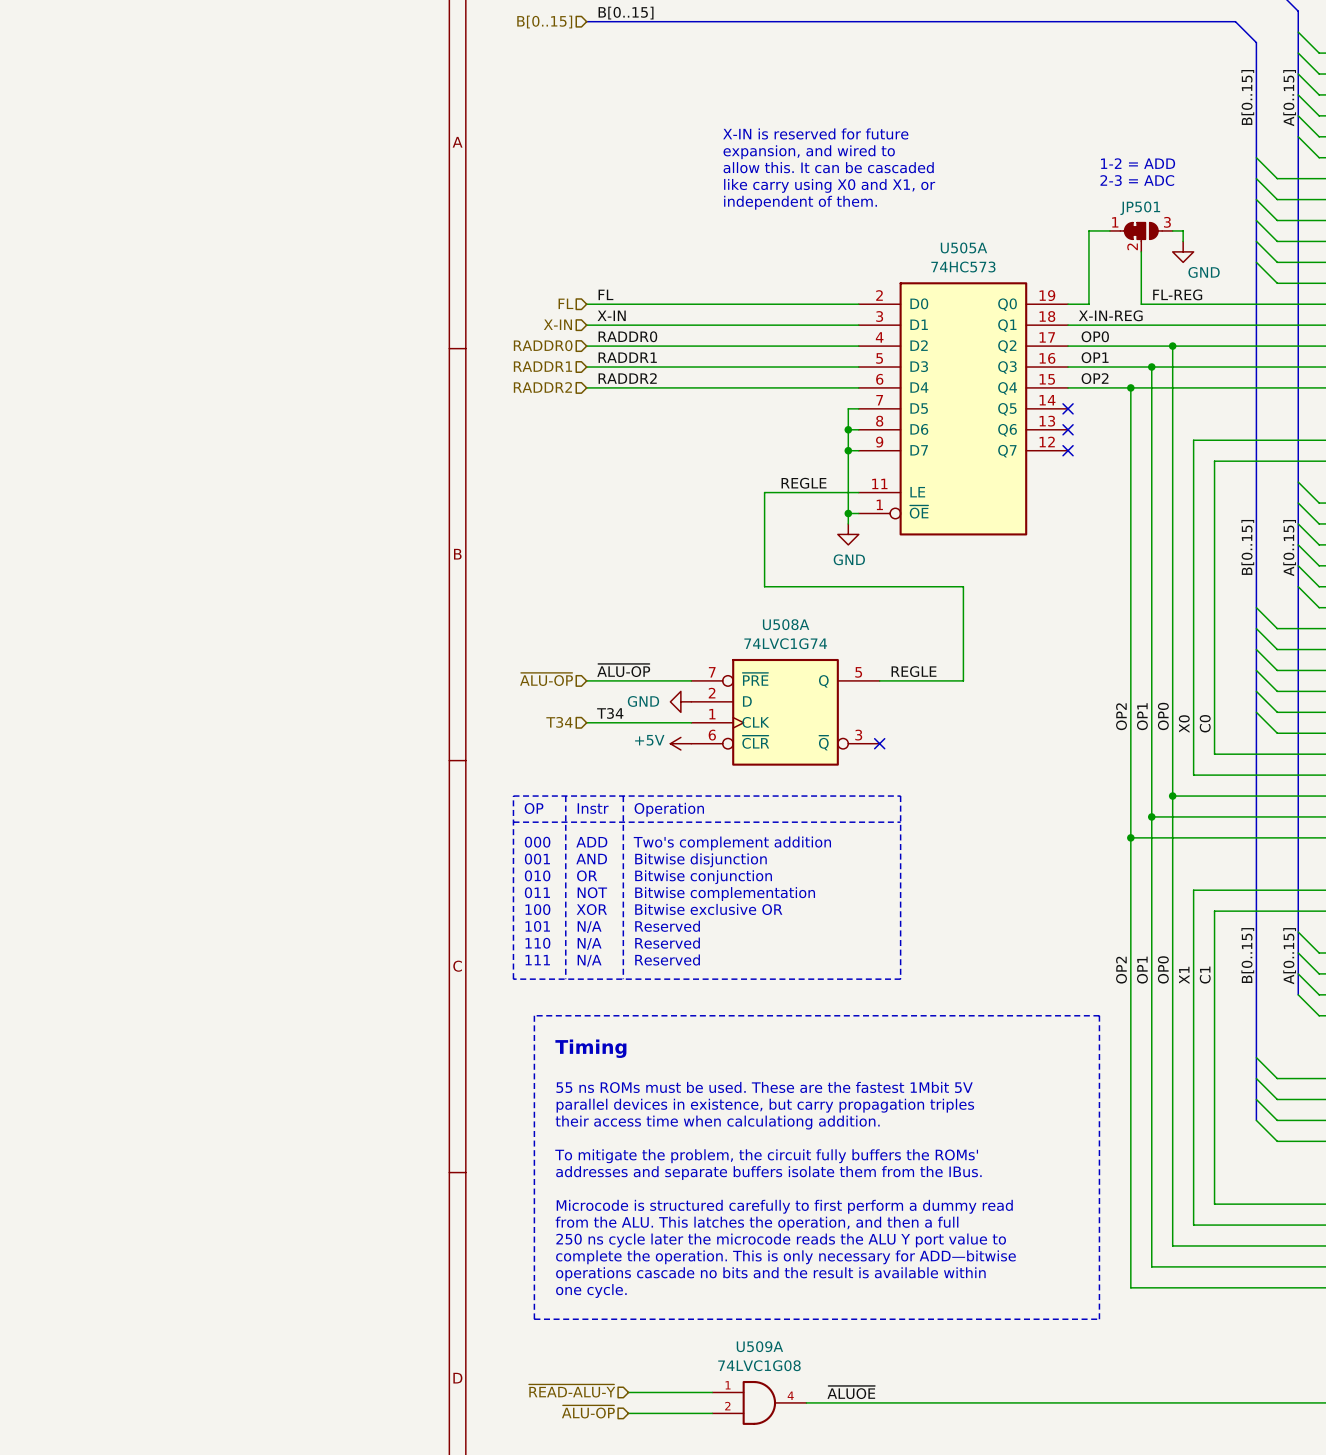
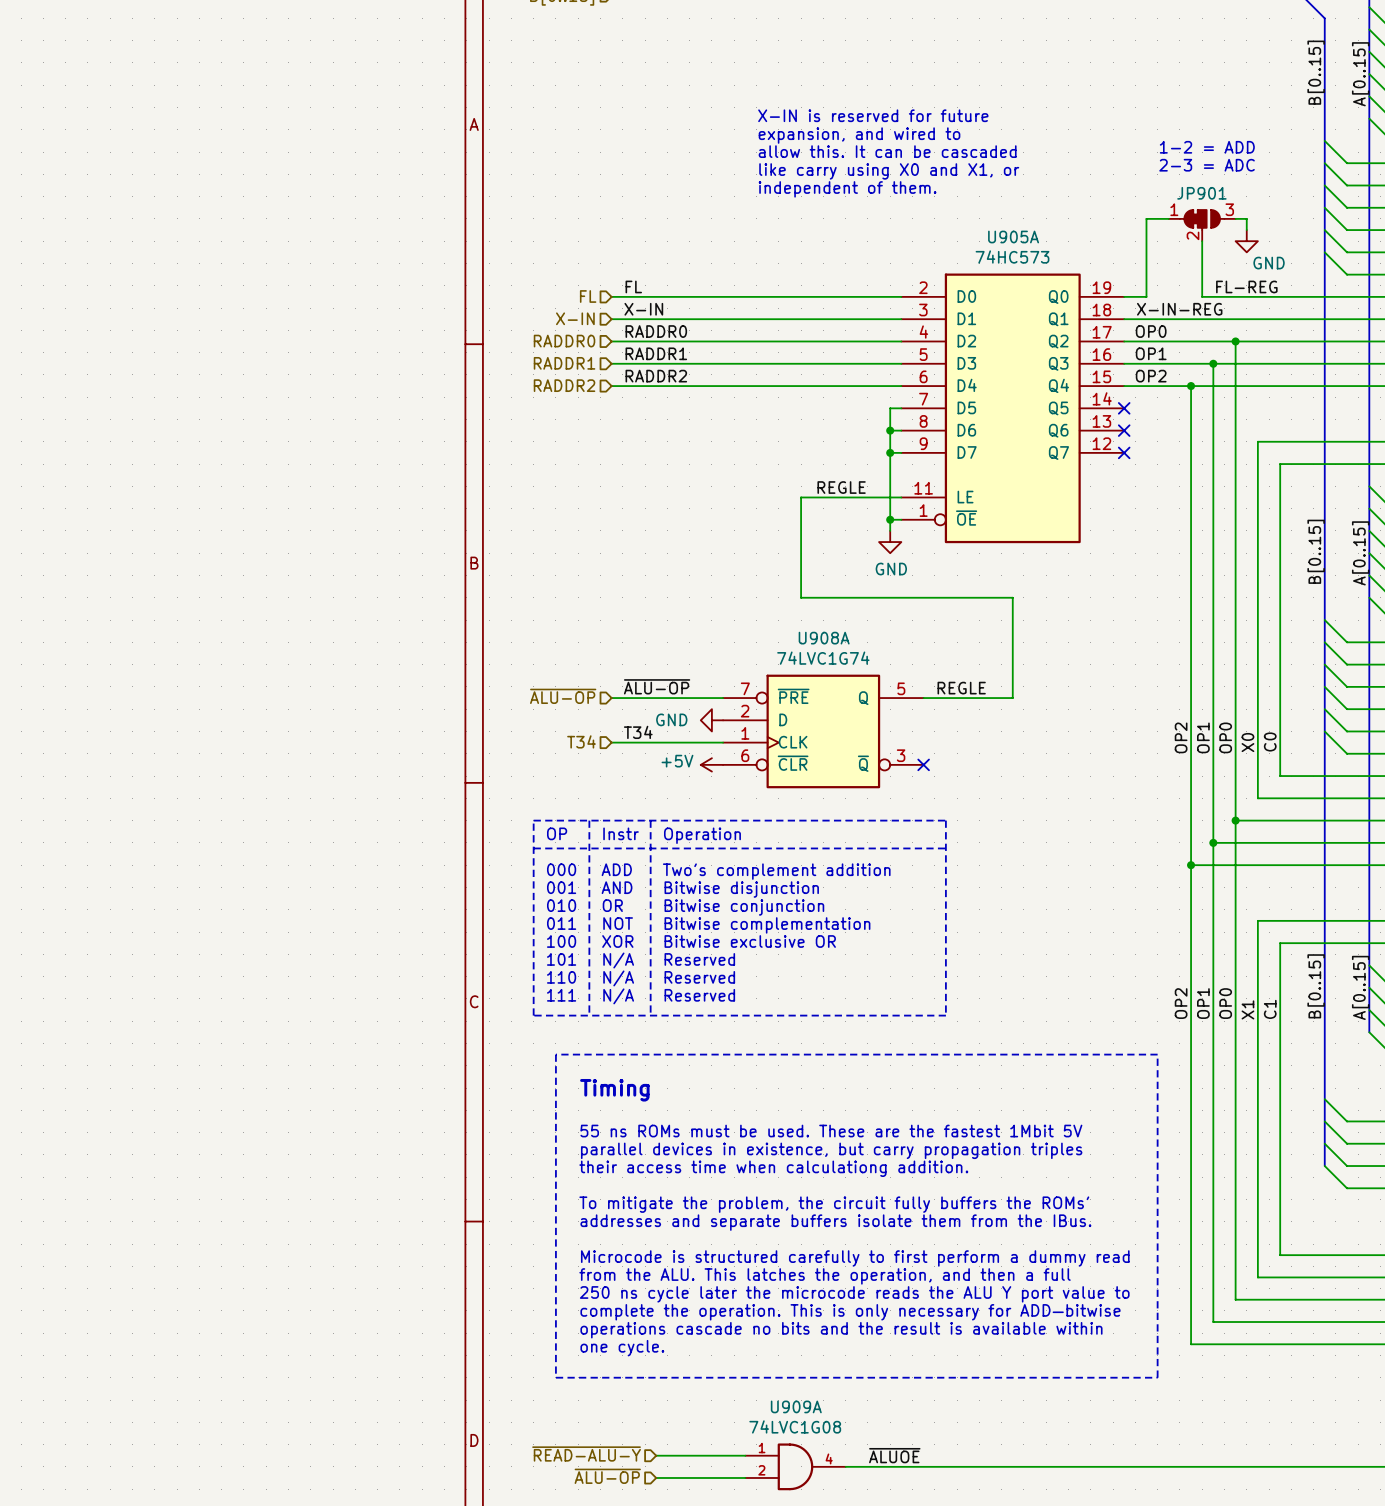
JP501 name: JP501 (1140, 208) -> JP901 (1201, 193)
U505A name: U505A (963, 247) -> U905A (1013, 237)
U508A name: U508A (786, 624) -> U908A (824, 638)
U509A name: U509A (759, 1346) -> U909A (796, 1406)

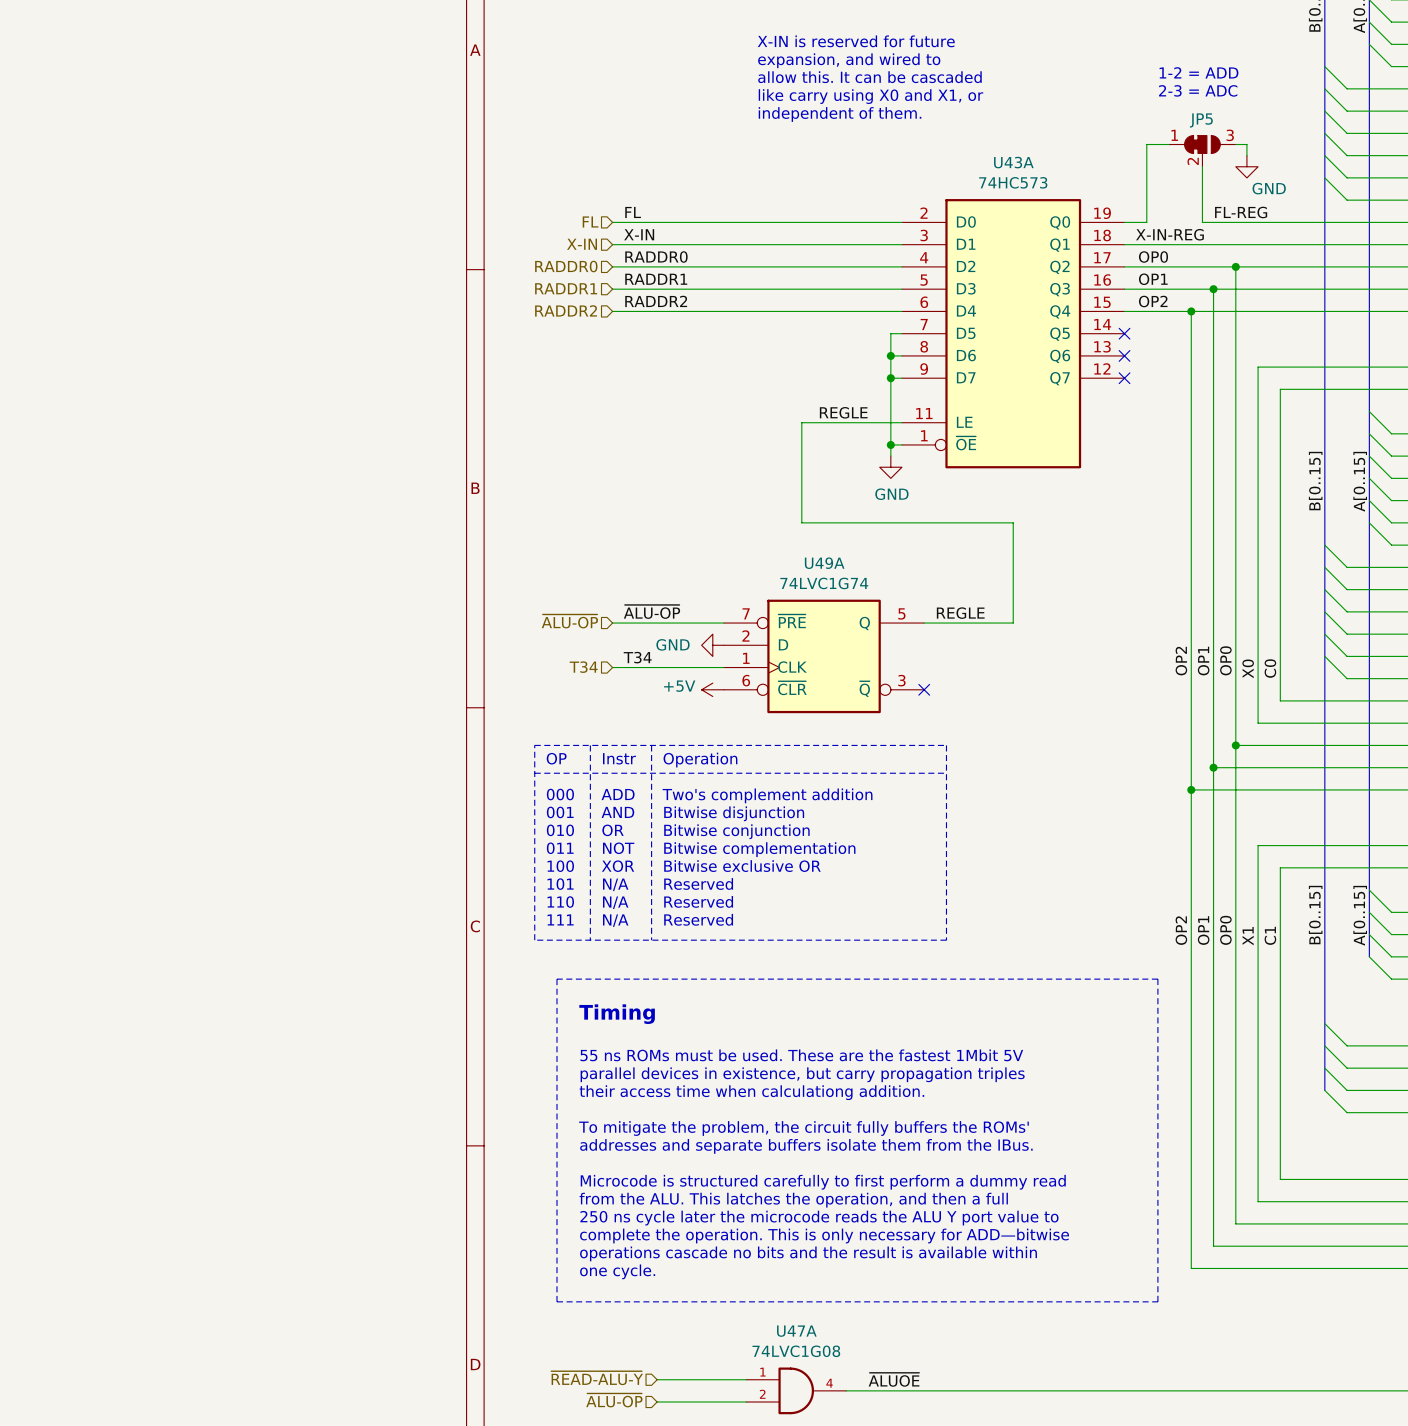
JP901 name: JP901 (1201, 193) -> JP5 (1201, 120)
U905A name: U905A (1013, 237) -> U43A (1013, 162)
U908A name: U908A (824, 638) -> U49A (824, 563)
U909A name: U909A (796, 1406) -> U47A (796, 1331)

